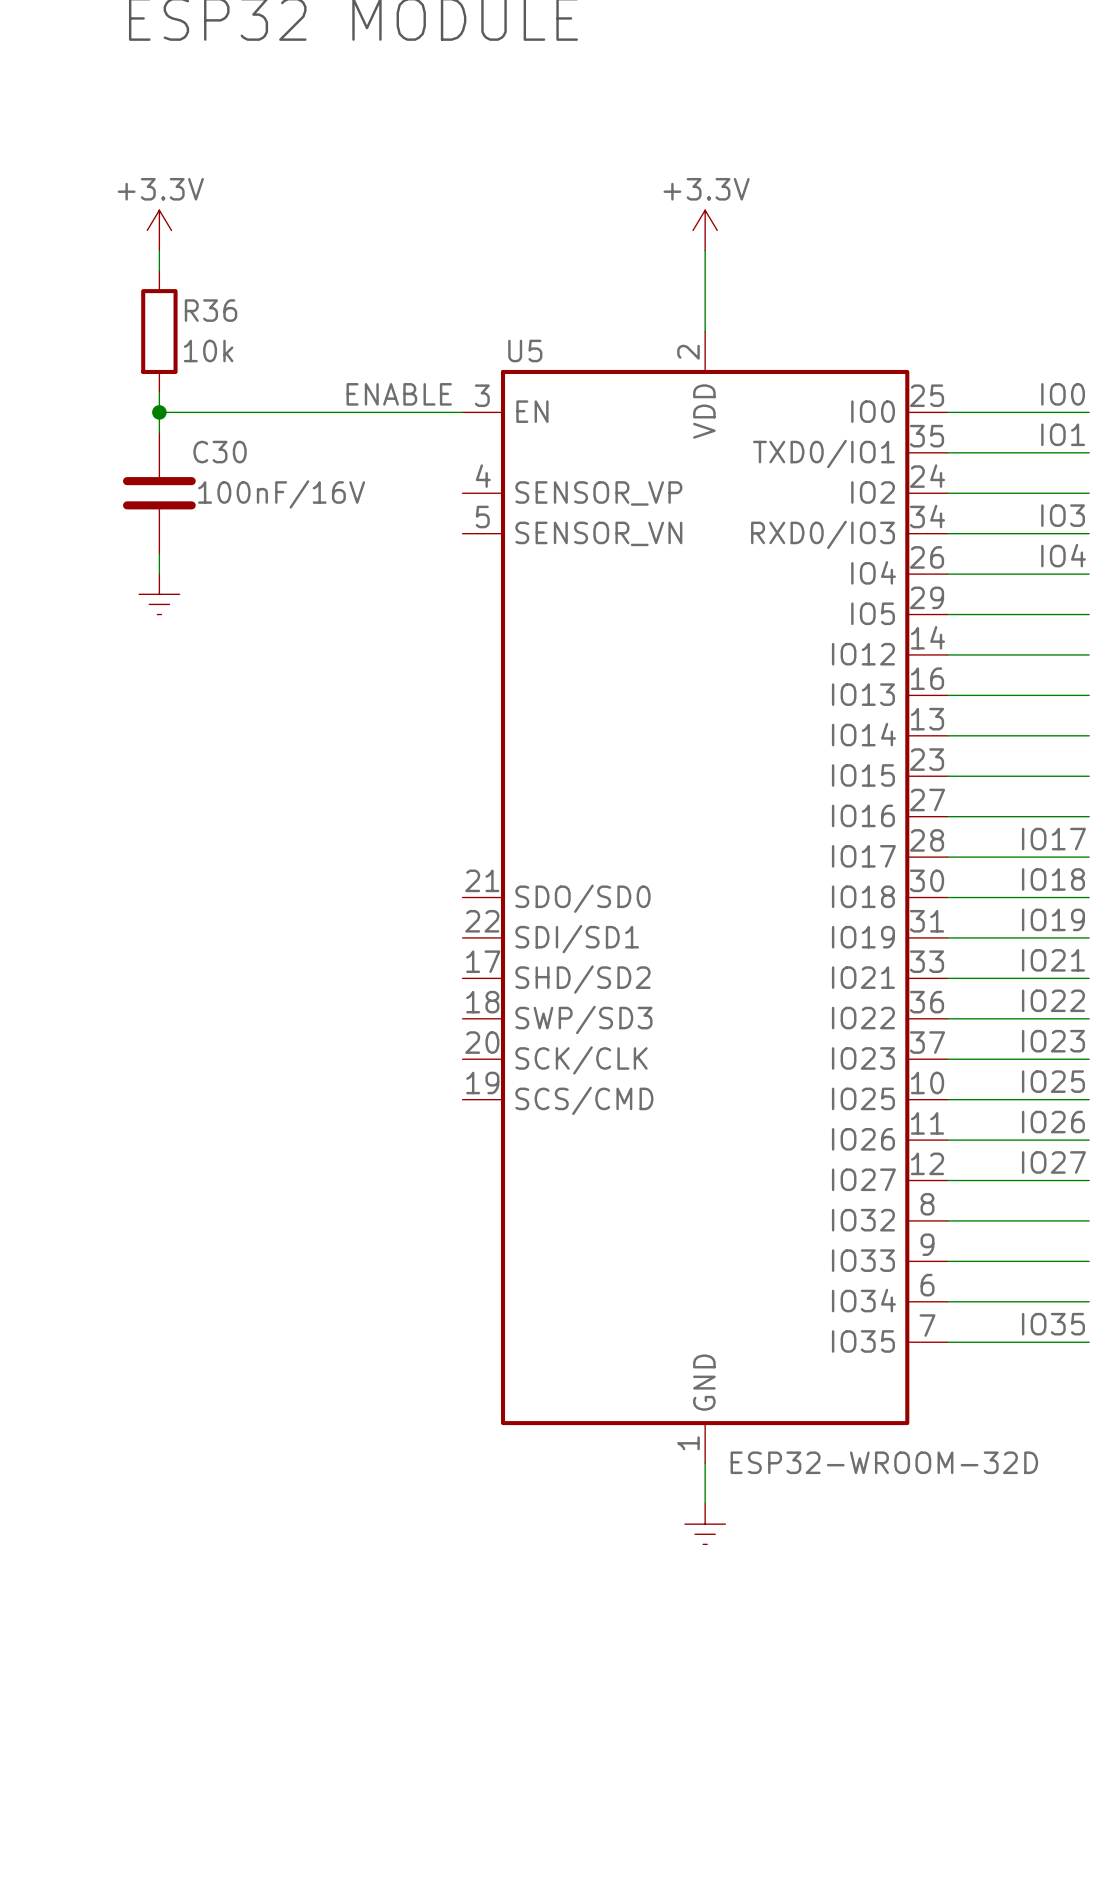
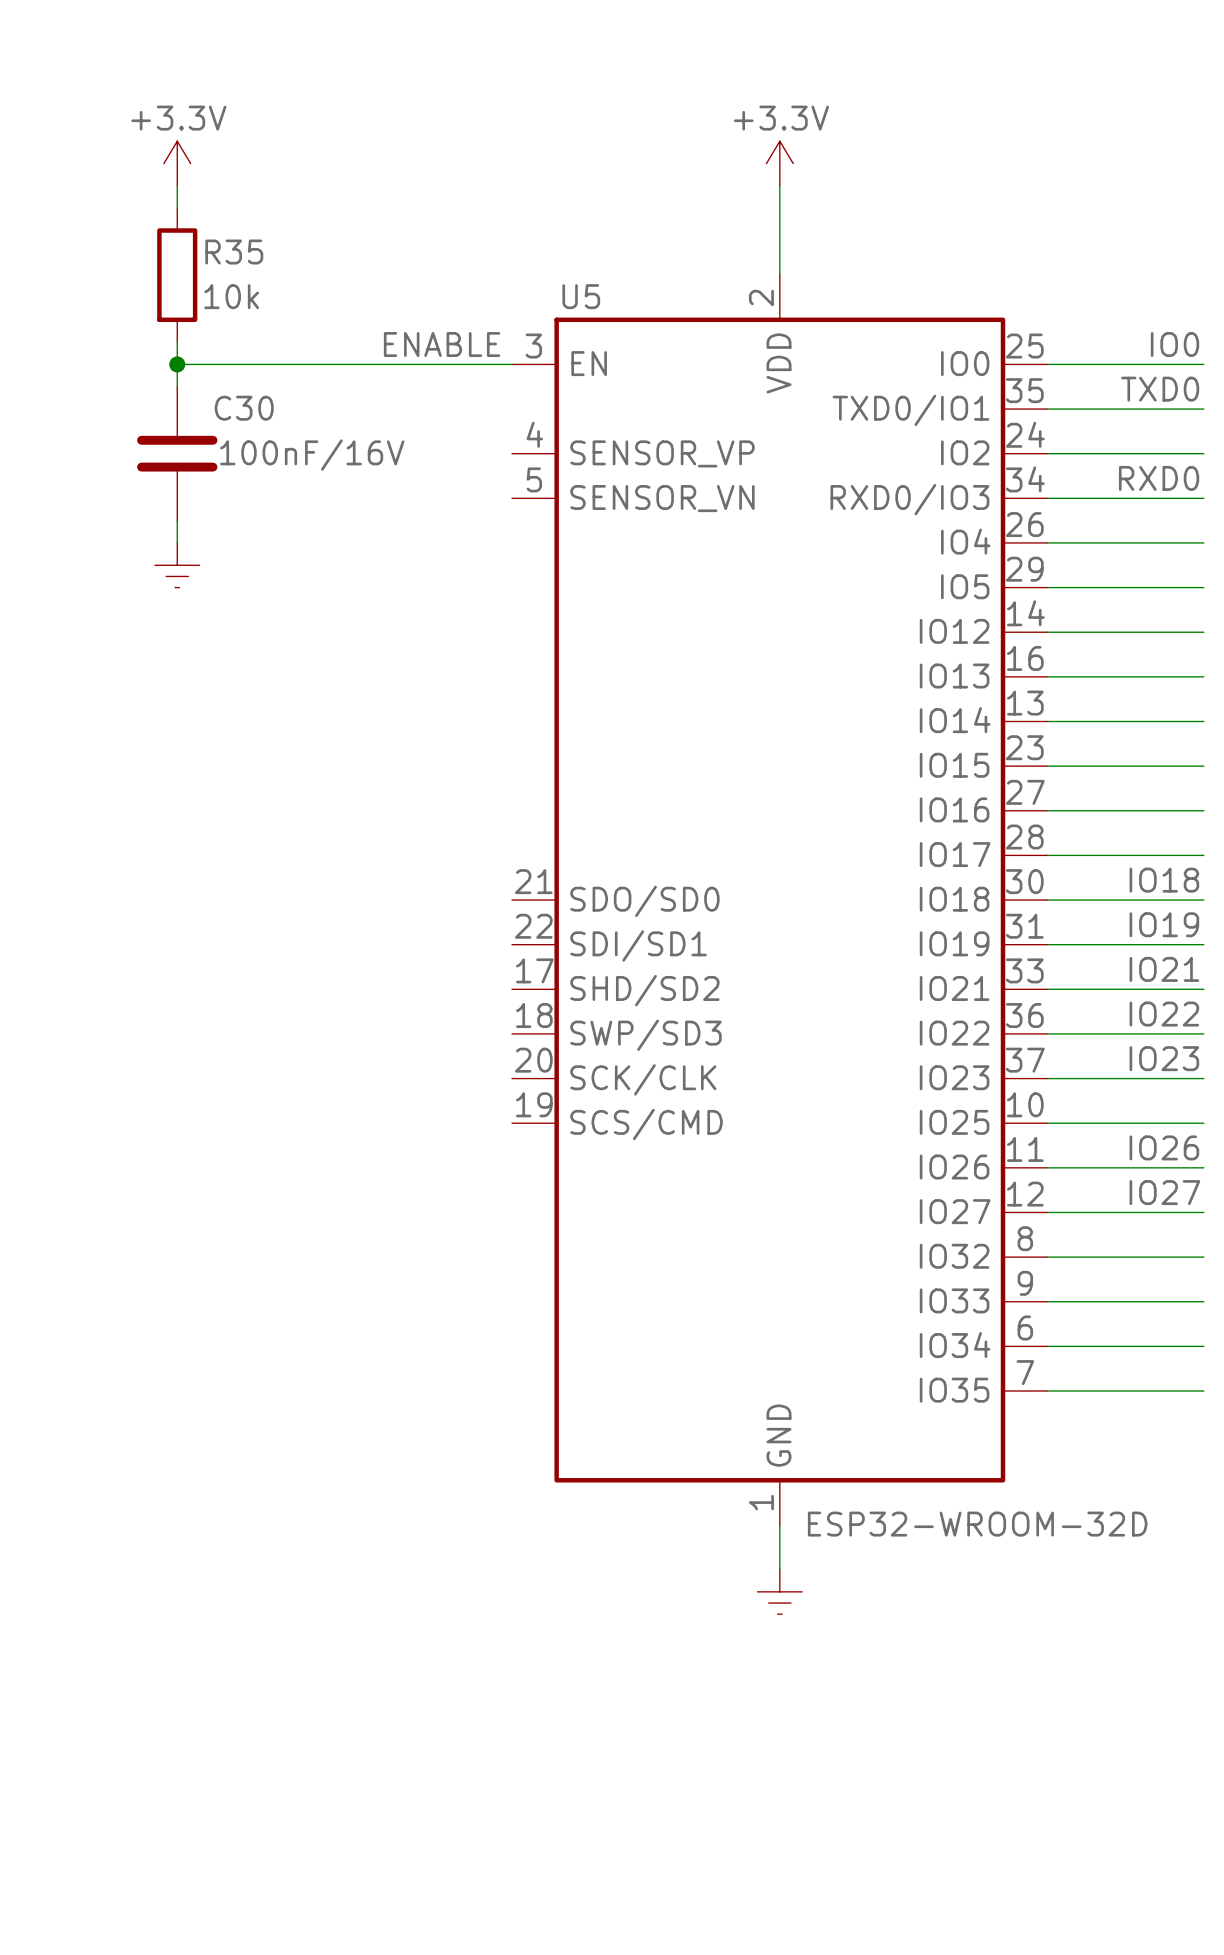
R36 name: R36 (211, 310) -> R35 (234, 252)
label: IO1 (1063, 434) -> TXD0 (1160, 389)
label: IO3 (1063, 515) -> RXD0 (1159, 478)
label: IO4 (1063, 555) -> none
label: IO17 (1053, 839) -> none
label: IO25 (1053, 1081) -> none
label: IO35 (1053, 1324) -> none

